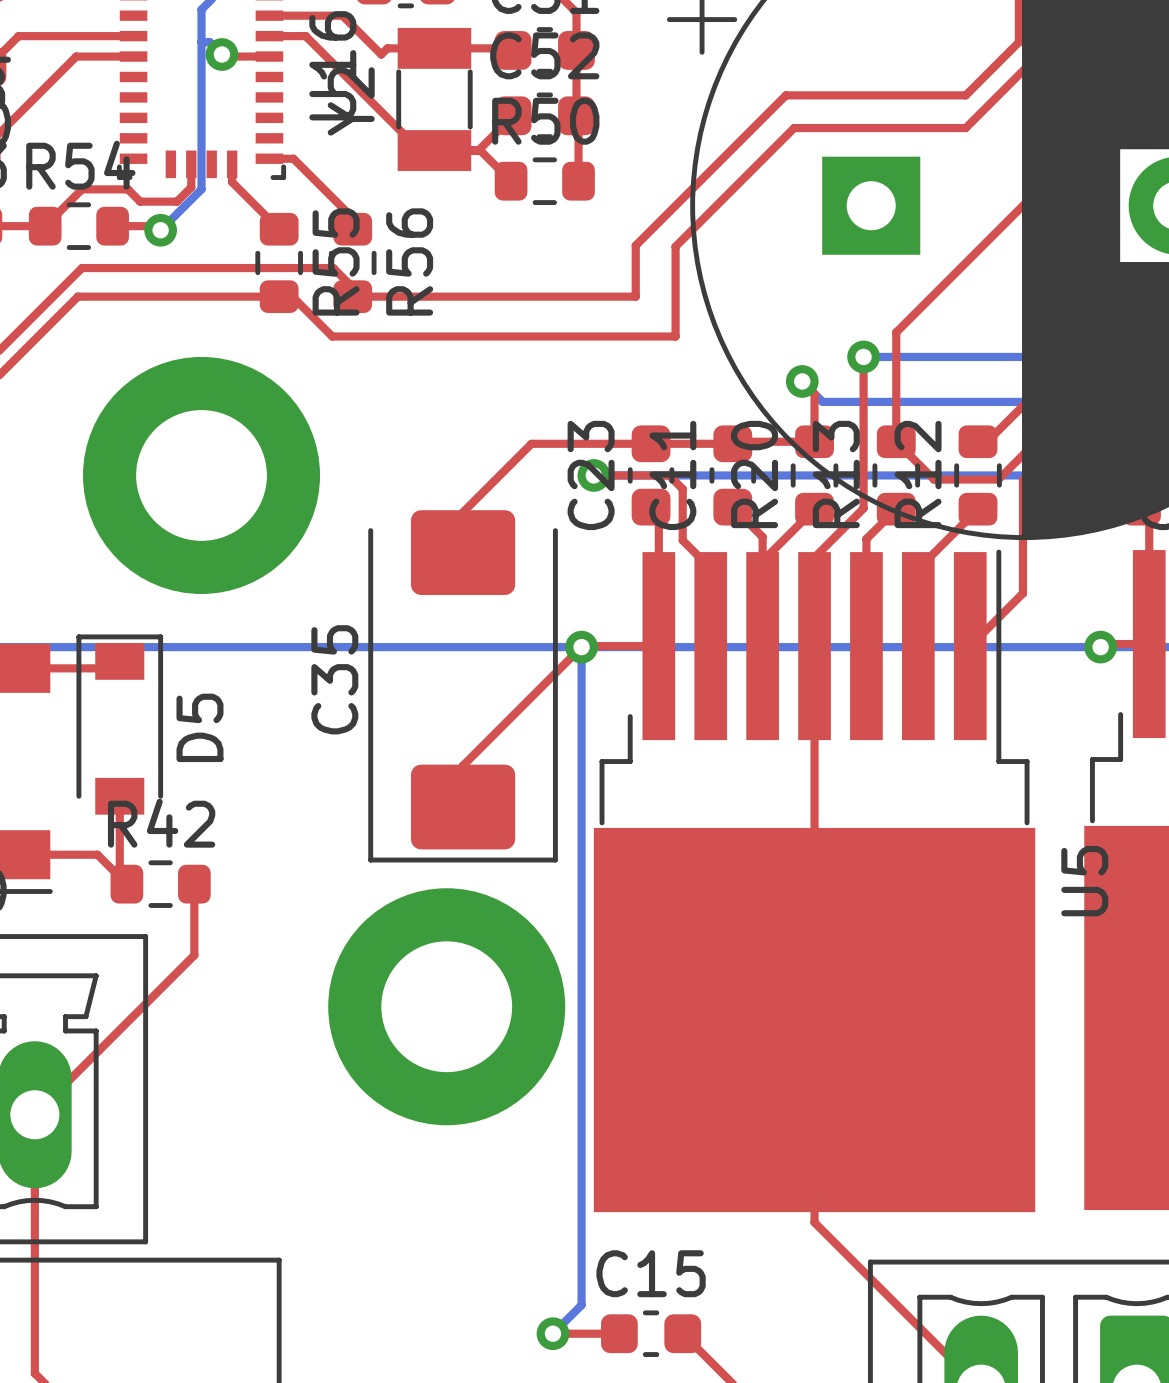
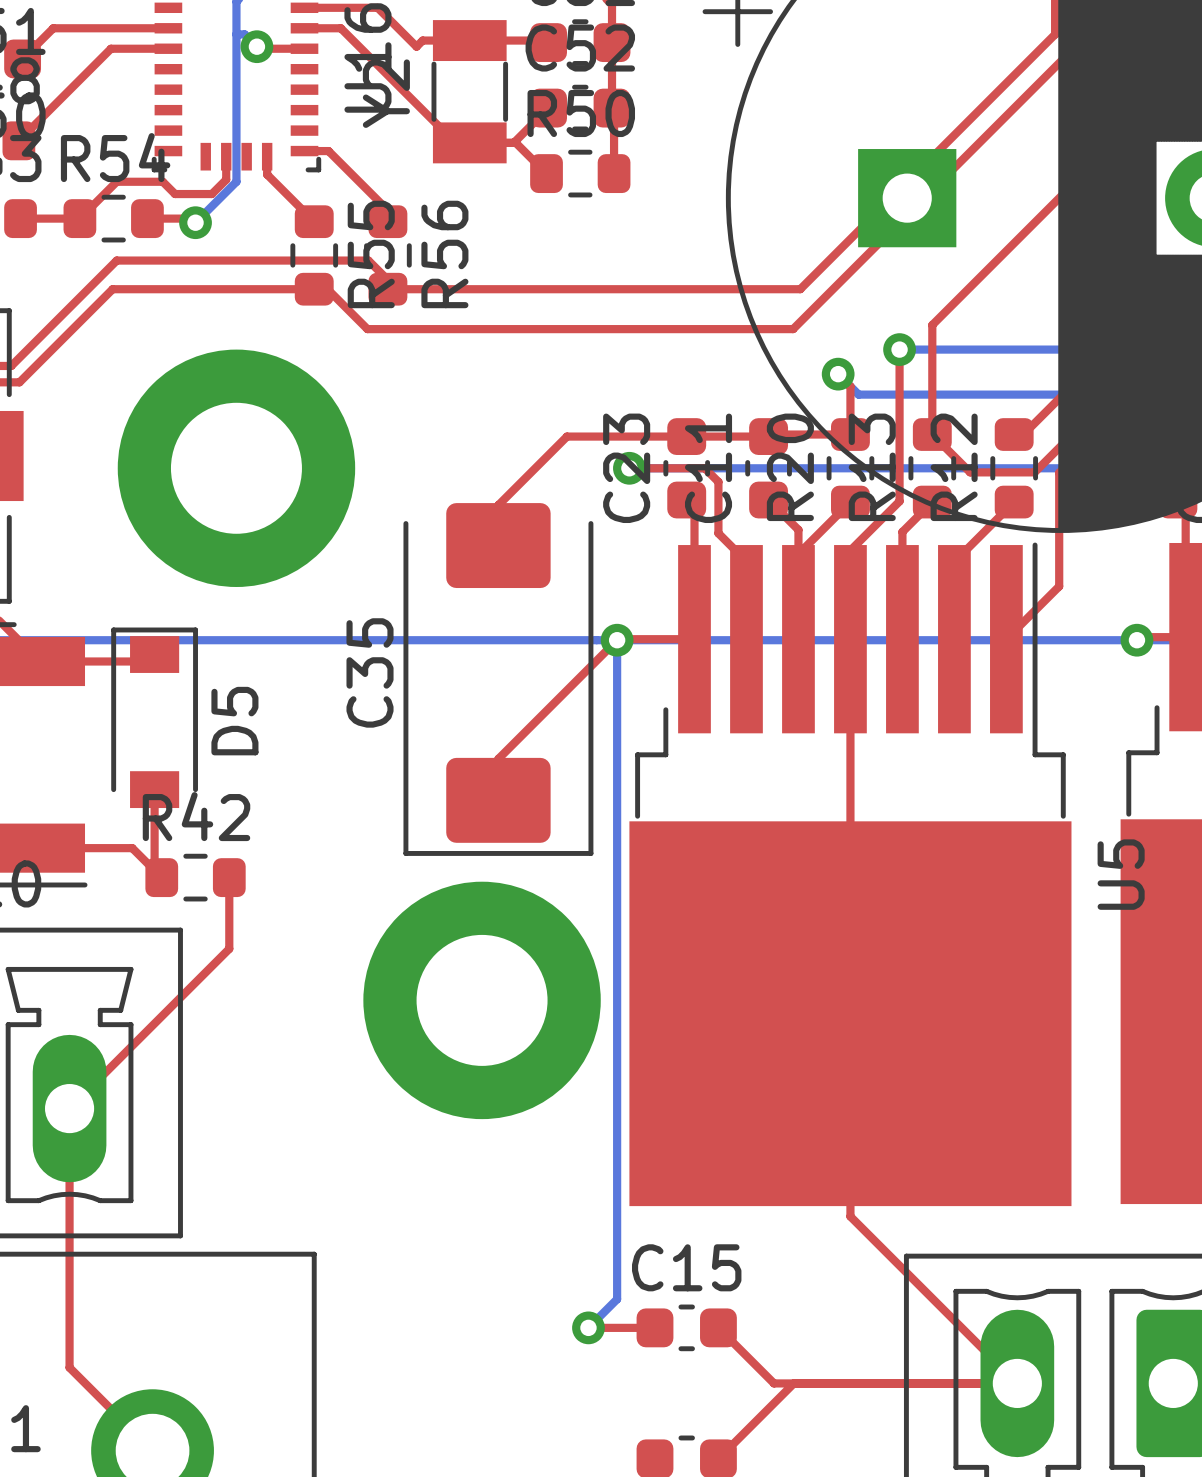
top track: (965, 95) (785, 95) (635, 245) (635, 296) -> (1001, 87) (800, 289) (671, 289)
top track: (965, 128) (794, 128) (675, 246) (675, 336) -> (1001, 120) (793, 329) (711, 329)

